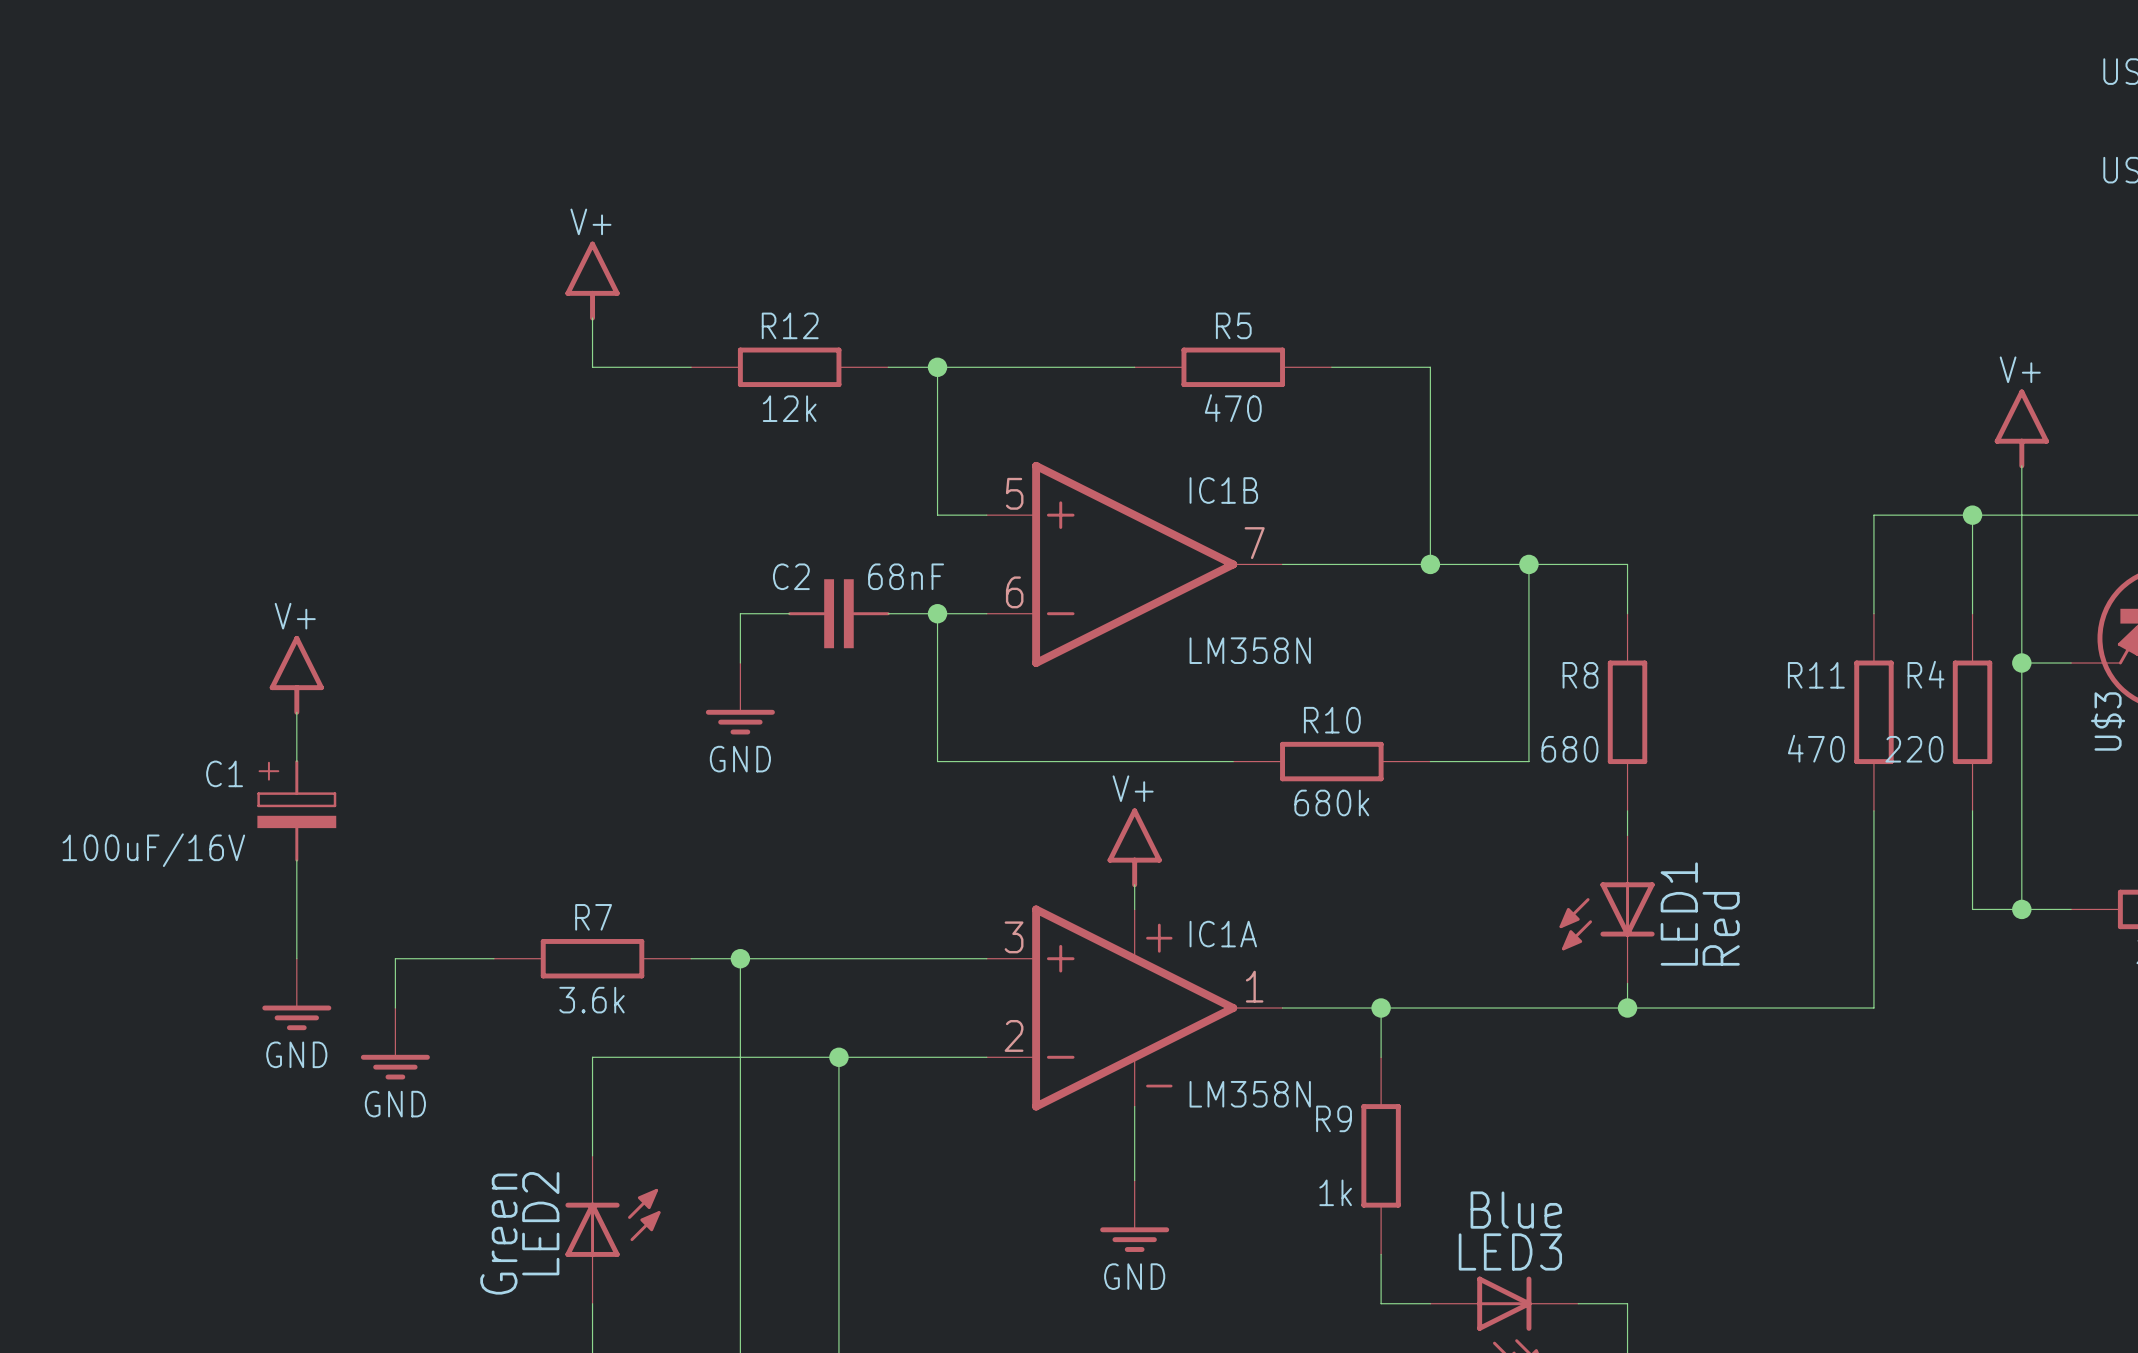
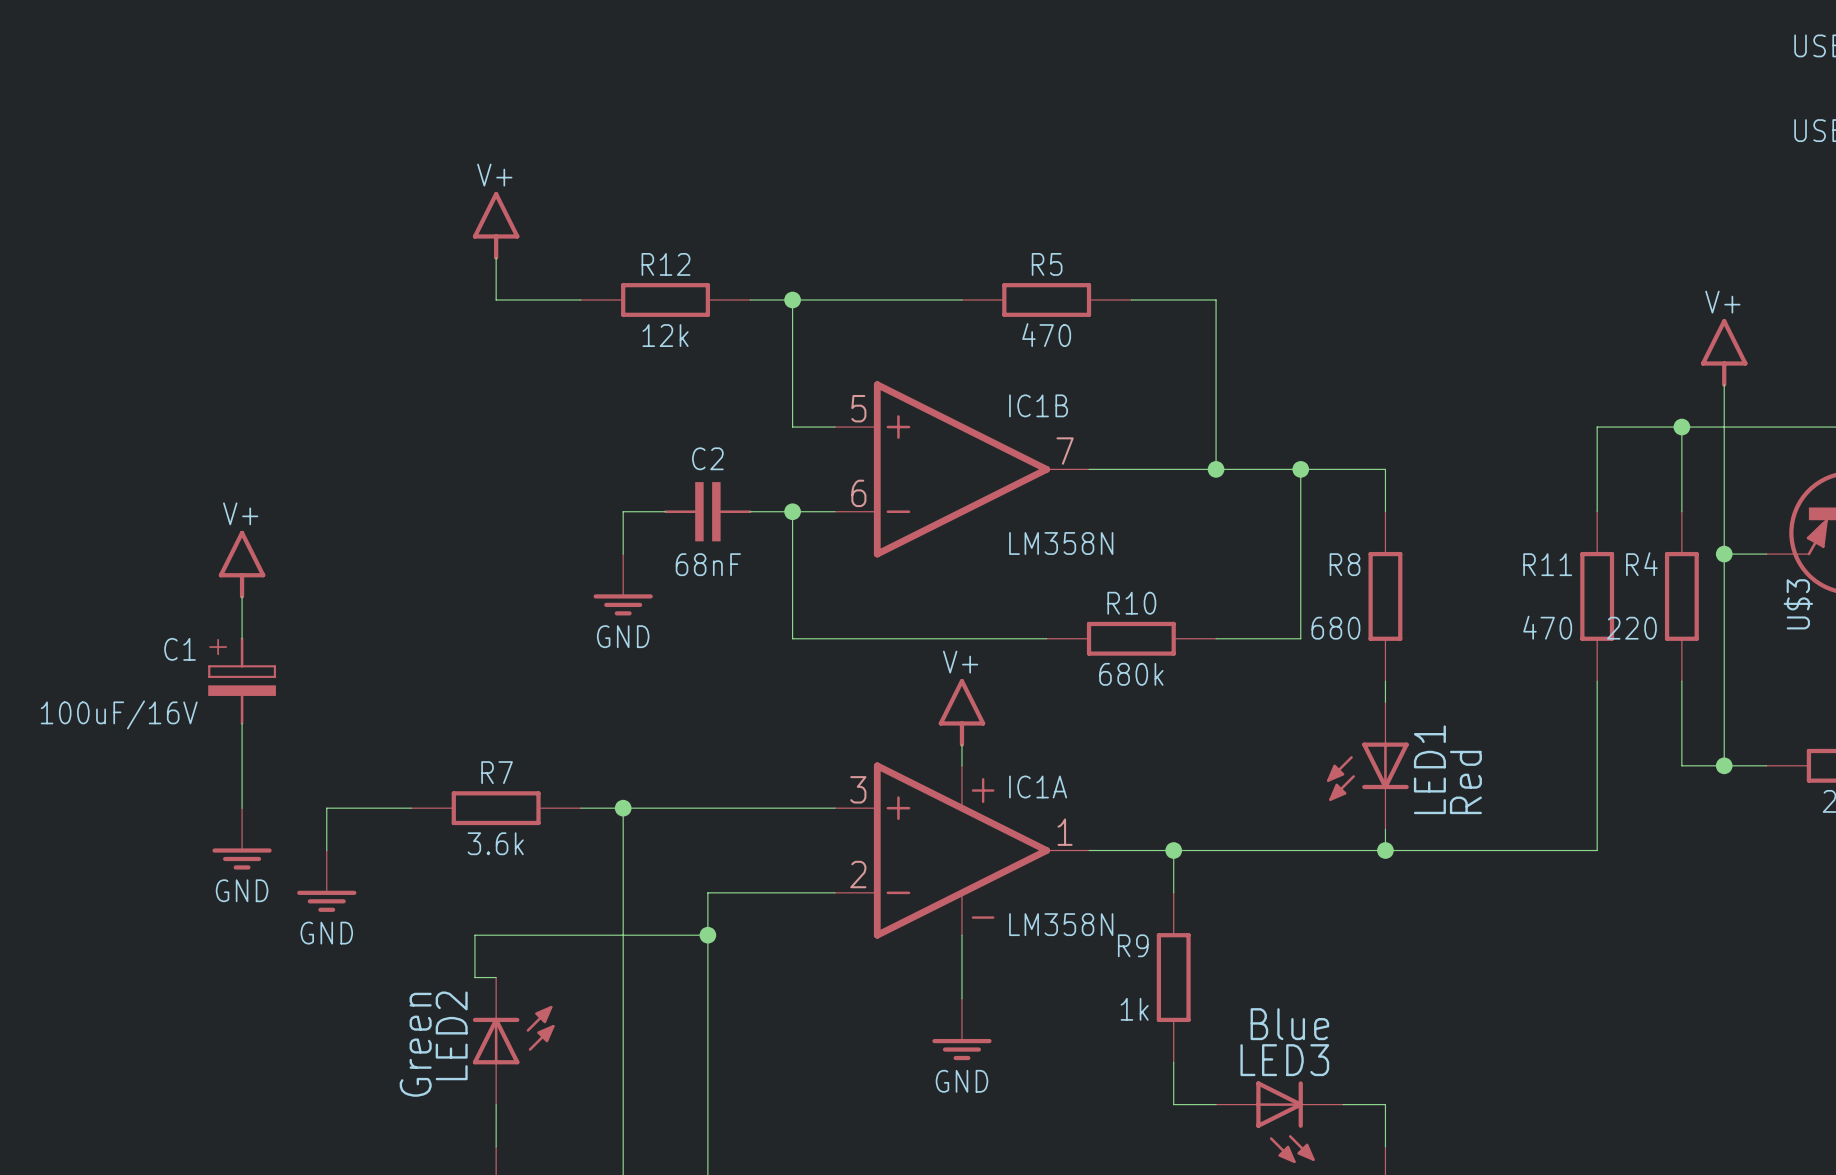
C2 name position: C2 (791, 576) -> C2 (707, 458)
C2 value position: 68nF (906, 576) -> 68nF (708, 564)
wire: (838, 1057) (592, 1057) (592, 1155) -> (707, 935) (474, 935) (474, 977) (496, 977)
junction position: (838, 1057) -> (707, 935)

